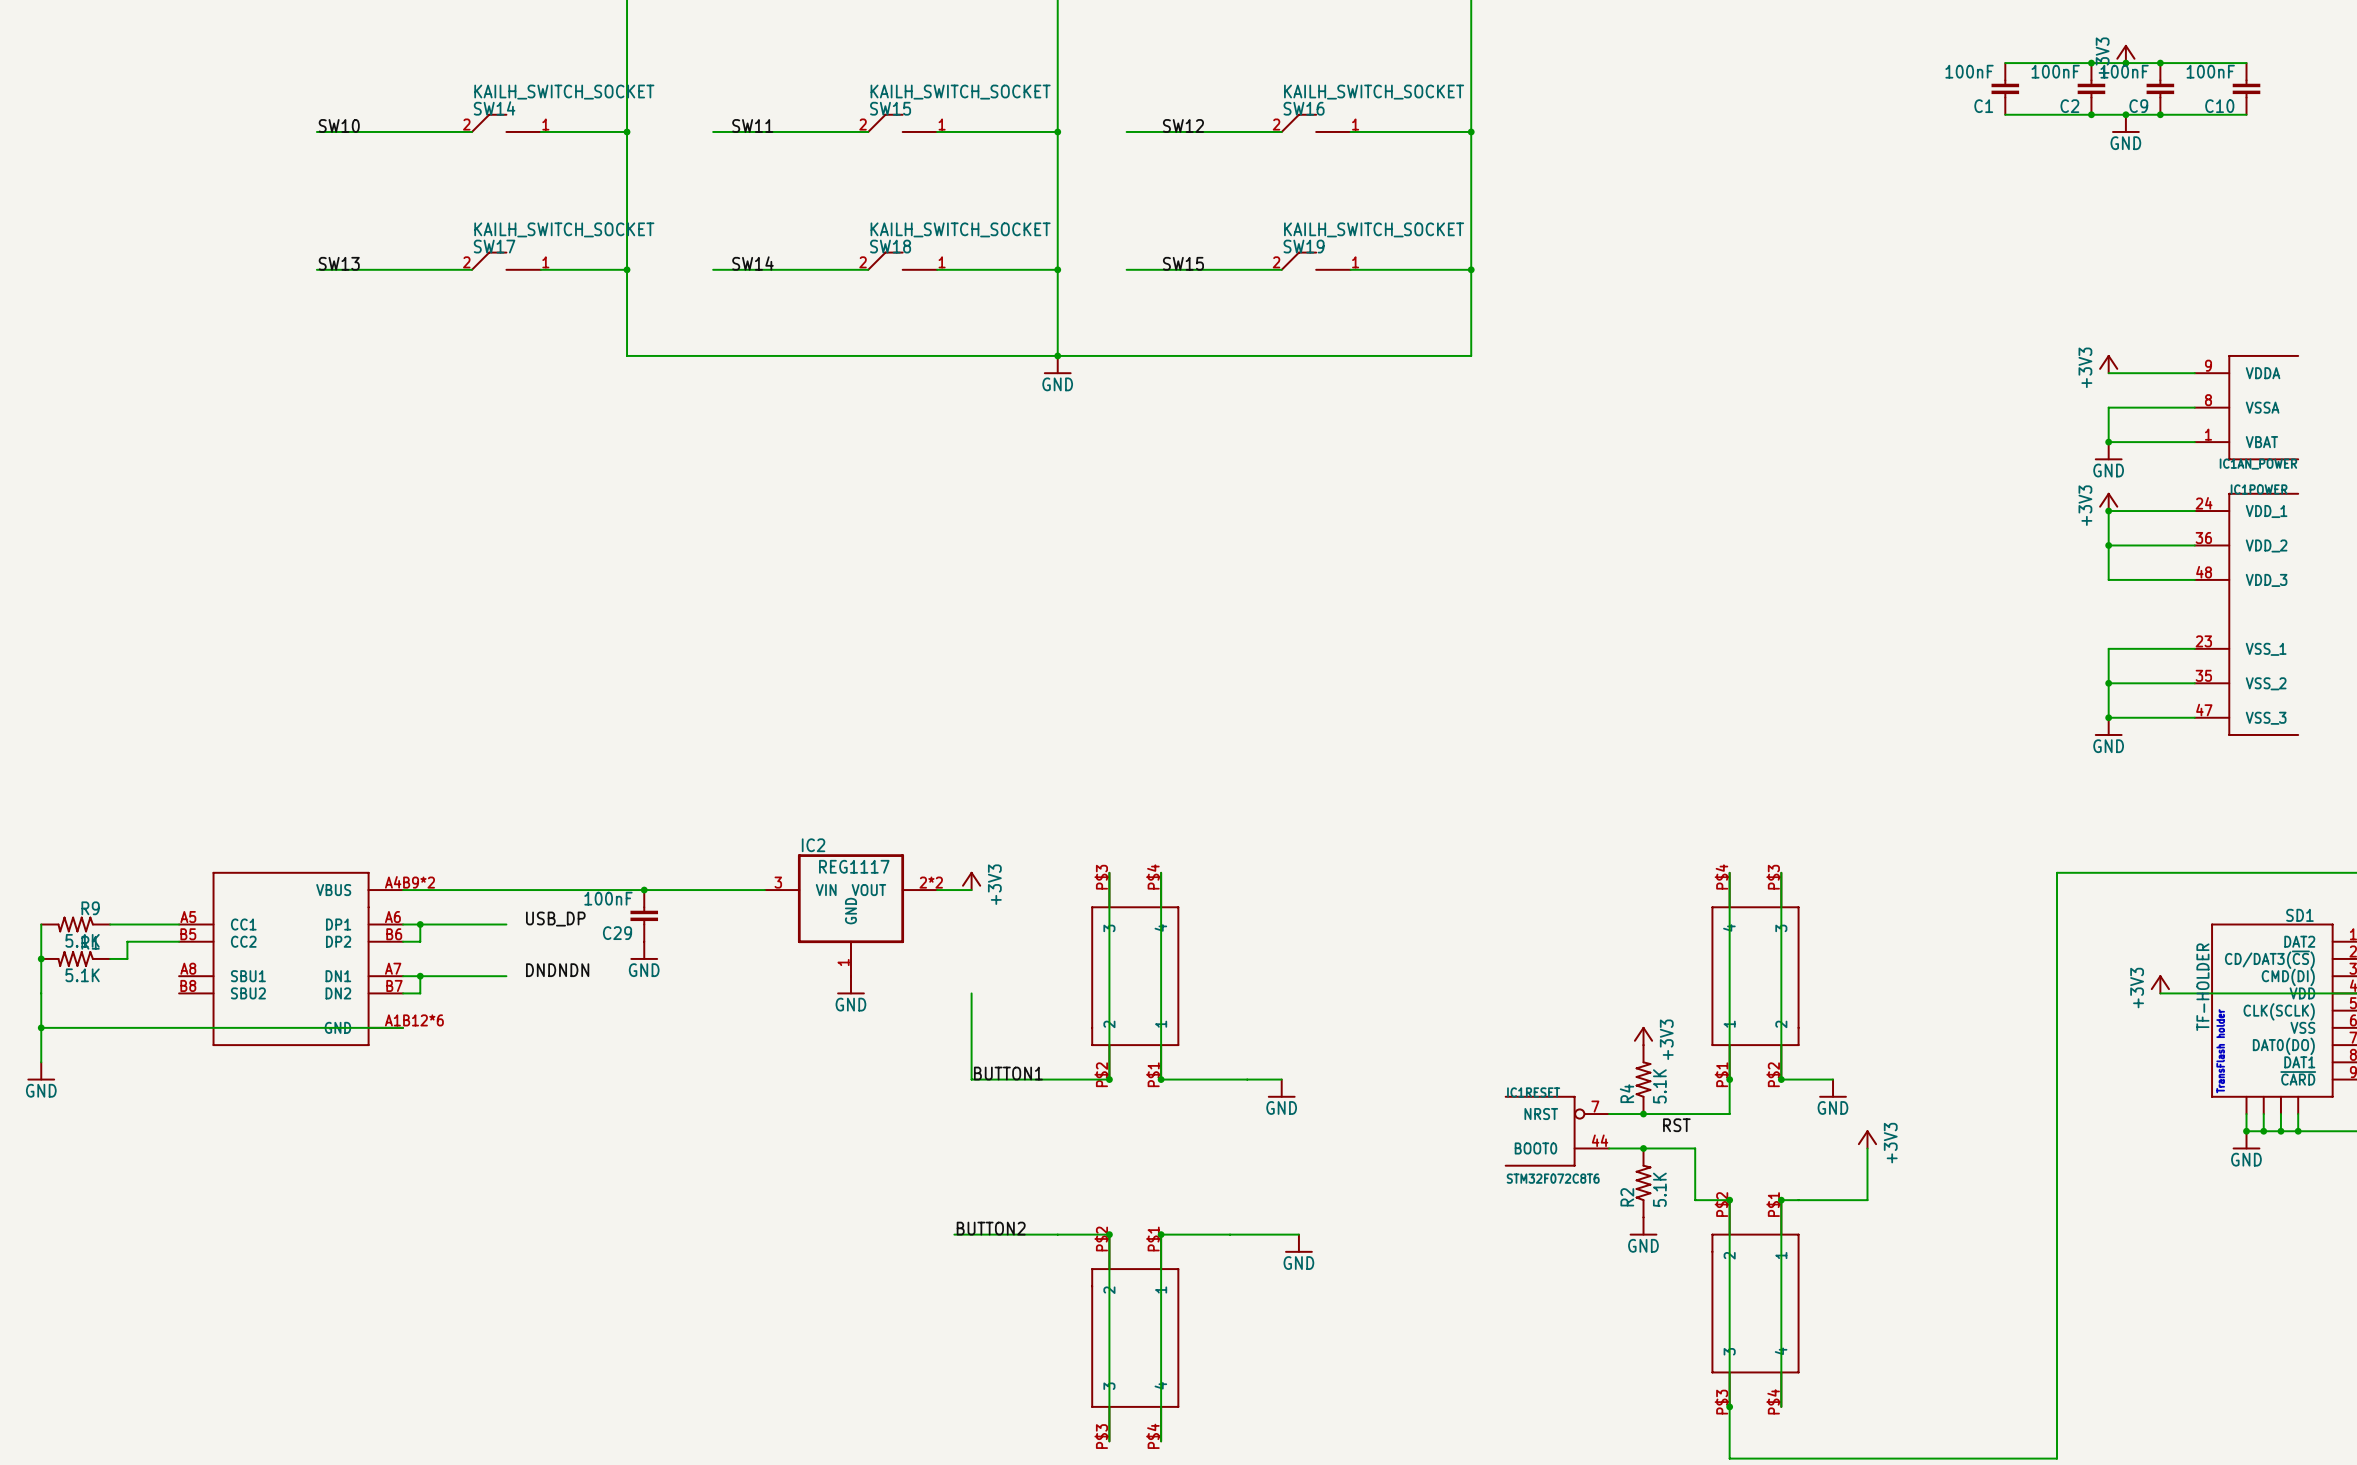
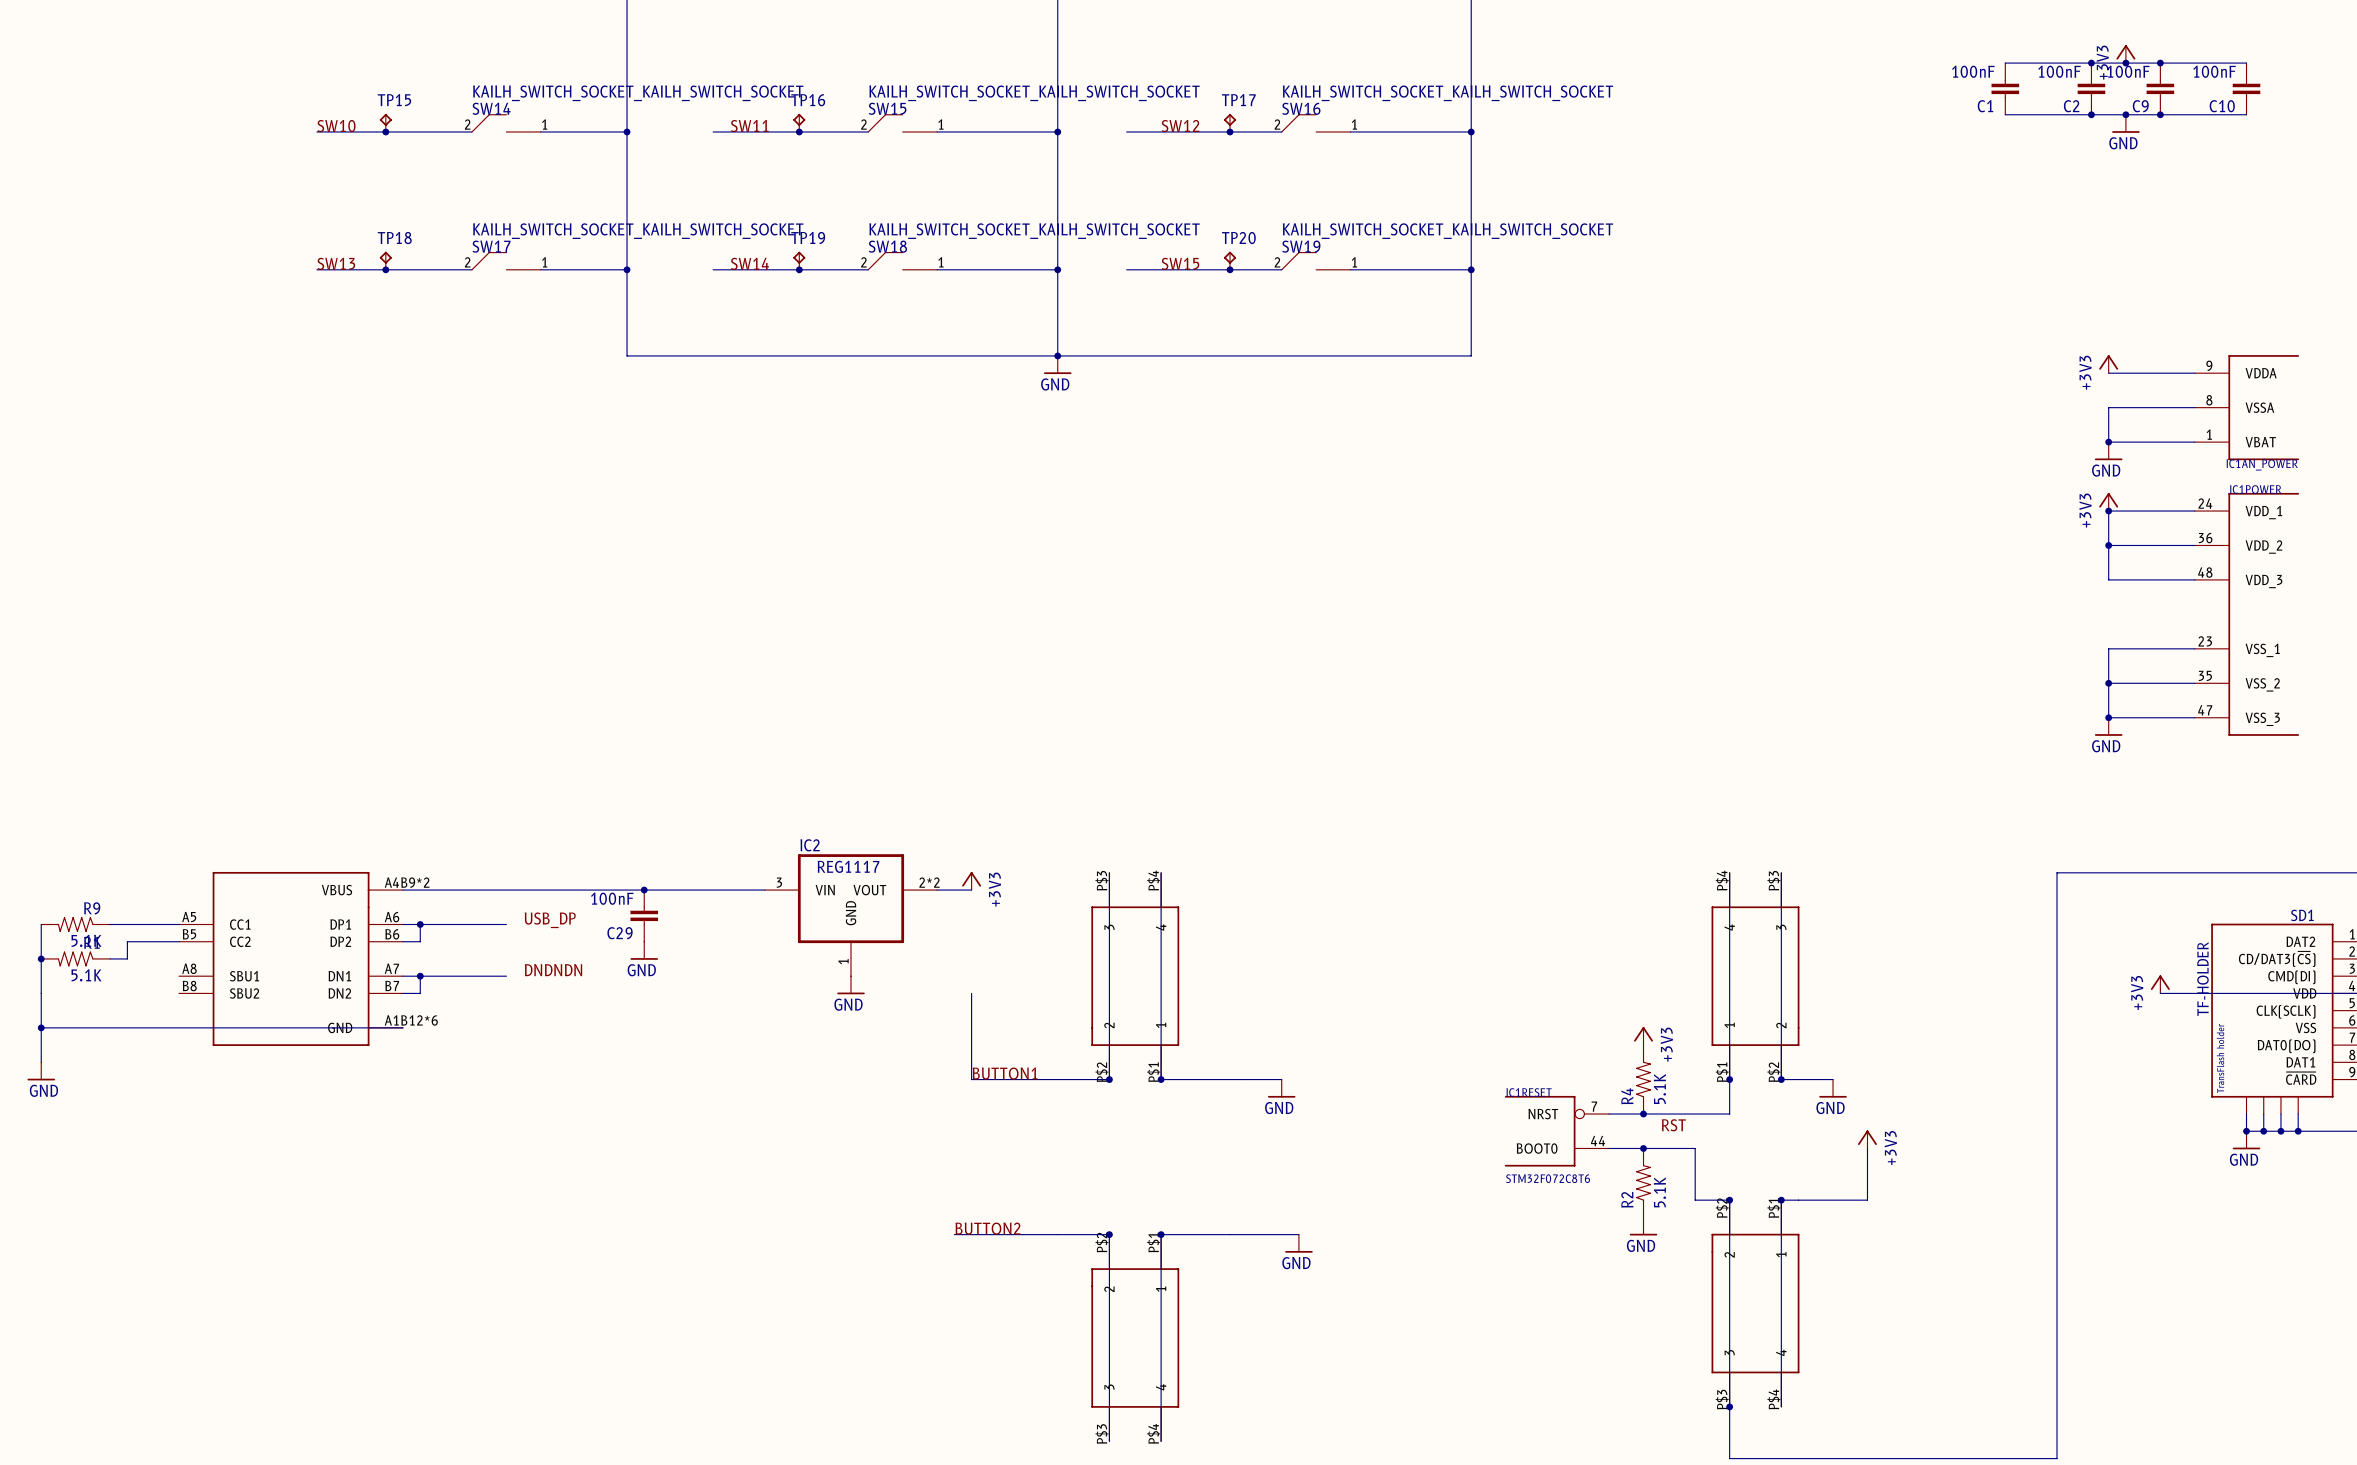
SW14 value: KAILH_SWITCH_SOCKET (564, 92) -> KAILH_SWITCH_SOCKET_KAILH_SWITCH_SOCKET (638, 93)
SW15 value: KAILH_SWITCH_SOCKET (960, 92) -> KAILH_SWITCH_SOCKET_KAILH_SWITCH_SOCKET (1034, 93)
SW16 value: KAILH_SWITCH_SOCKET (1374, 92) -> KAILH_SWITCH_SOCKET_KAILH_SWITCH_SOCKET (1448, 93)
TP15: none -> (385, 122)
TP16: none -> (799, 122)
TP17: none -> (1230, 122)
junction: none -> (385, 131)
junction: none -> (799, 131)
junction: none -> (1230, 131)
SW17 value: KAILH_SWITCH_SOCKET (564, 229) -> KAILH_SWITCH_SOCKET_KAILH_SWITCH_SOCKET (638, 231)
SW18 value: KAILH_SWITCH_SOCKET (960, 229) -> KAILH_SWITCH_SOCKET_KAILH_SWITCH_SOCKET (1034, 231)
SW19 value: KAILH_SWITCH_SOCKET (1374, 229) -> KAILH_SWITCH_SOCKET_KAILH_SWITCH_SOCKET (1448, 231)
TP18: none -> (385, 260)
TP19: none -> (799, 260)
TP20: none -> (1230, 260)
junction: none -> (385, 269)
junction: none -> (799, 269)
junction: none -> (1230, 269)

